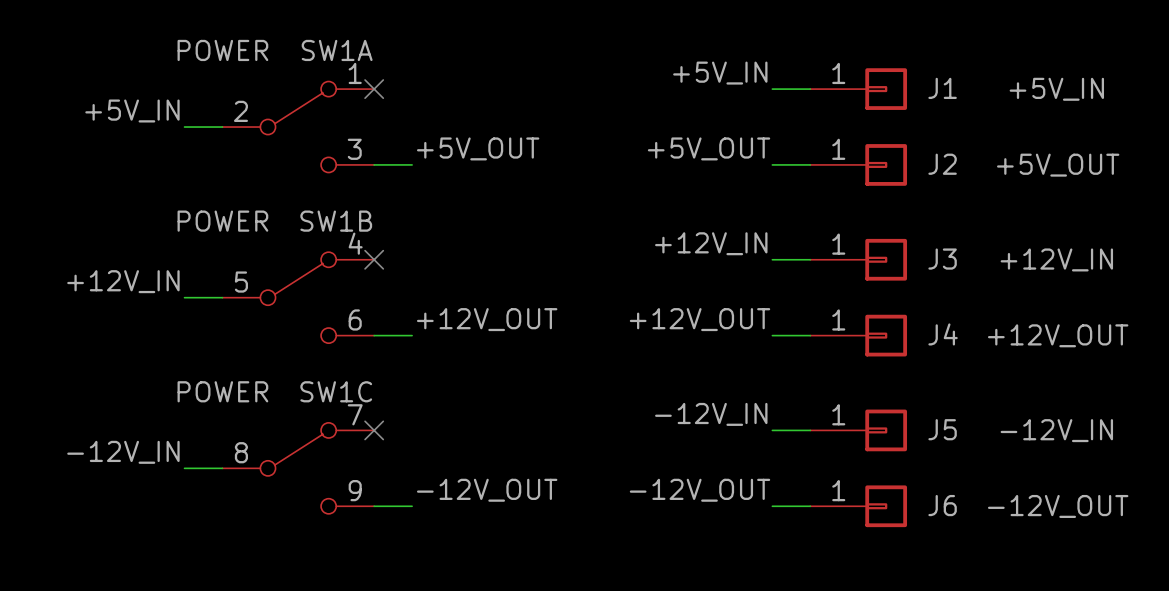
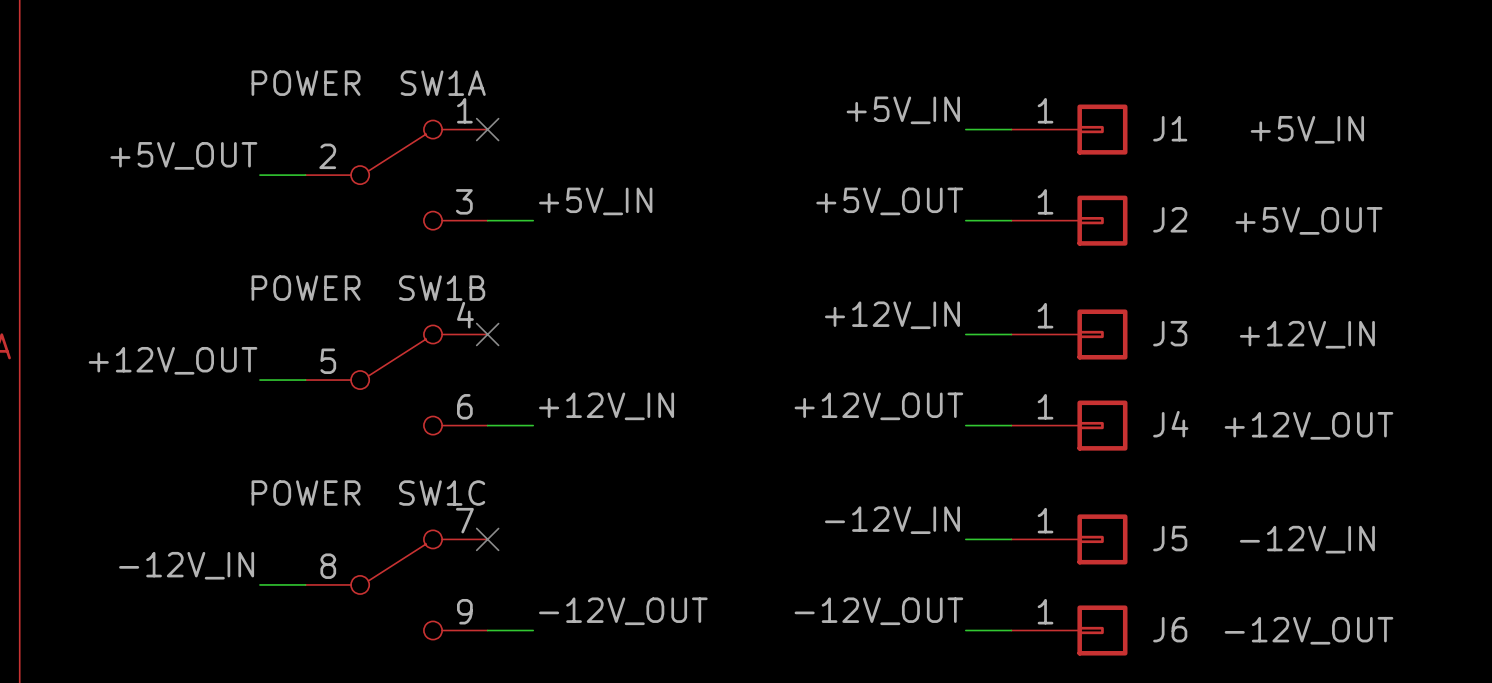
label: +5V_IN (132, 111) -> +5V_OUT (183, 155)
label: +5V_OUT (478, 148) -> +5V_IN (595, 201)
label: +12V_IN (123, 281) -> +12V_OUT (173, 360)
label: +12V_OUT (487, 319) -> +12V_IN (606, 406)

